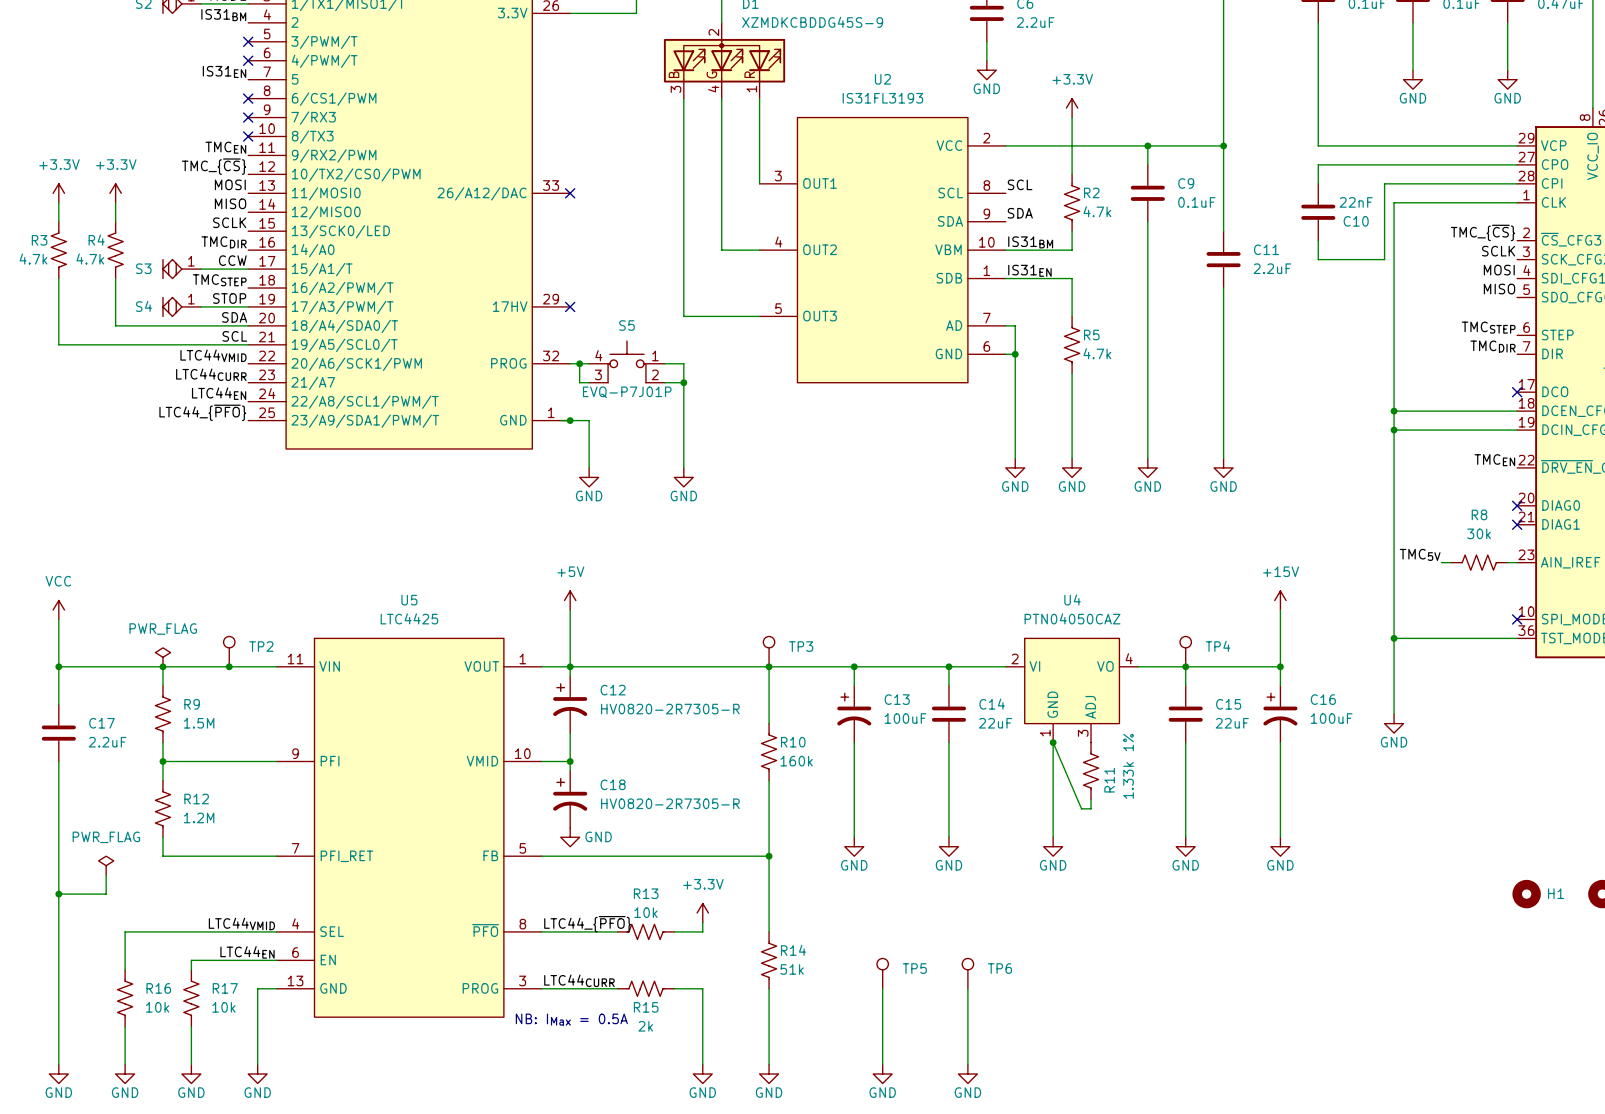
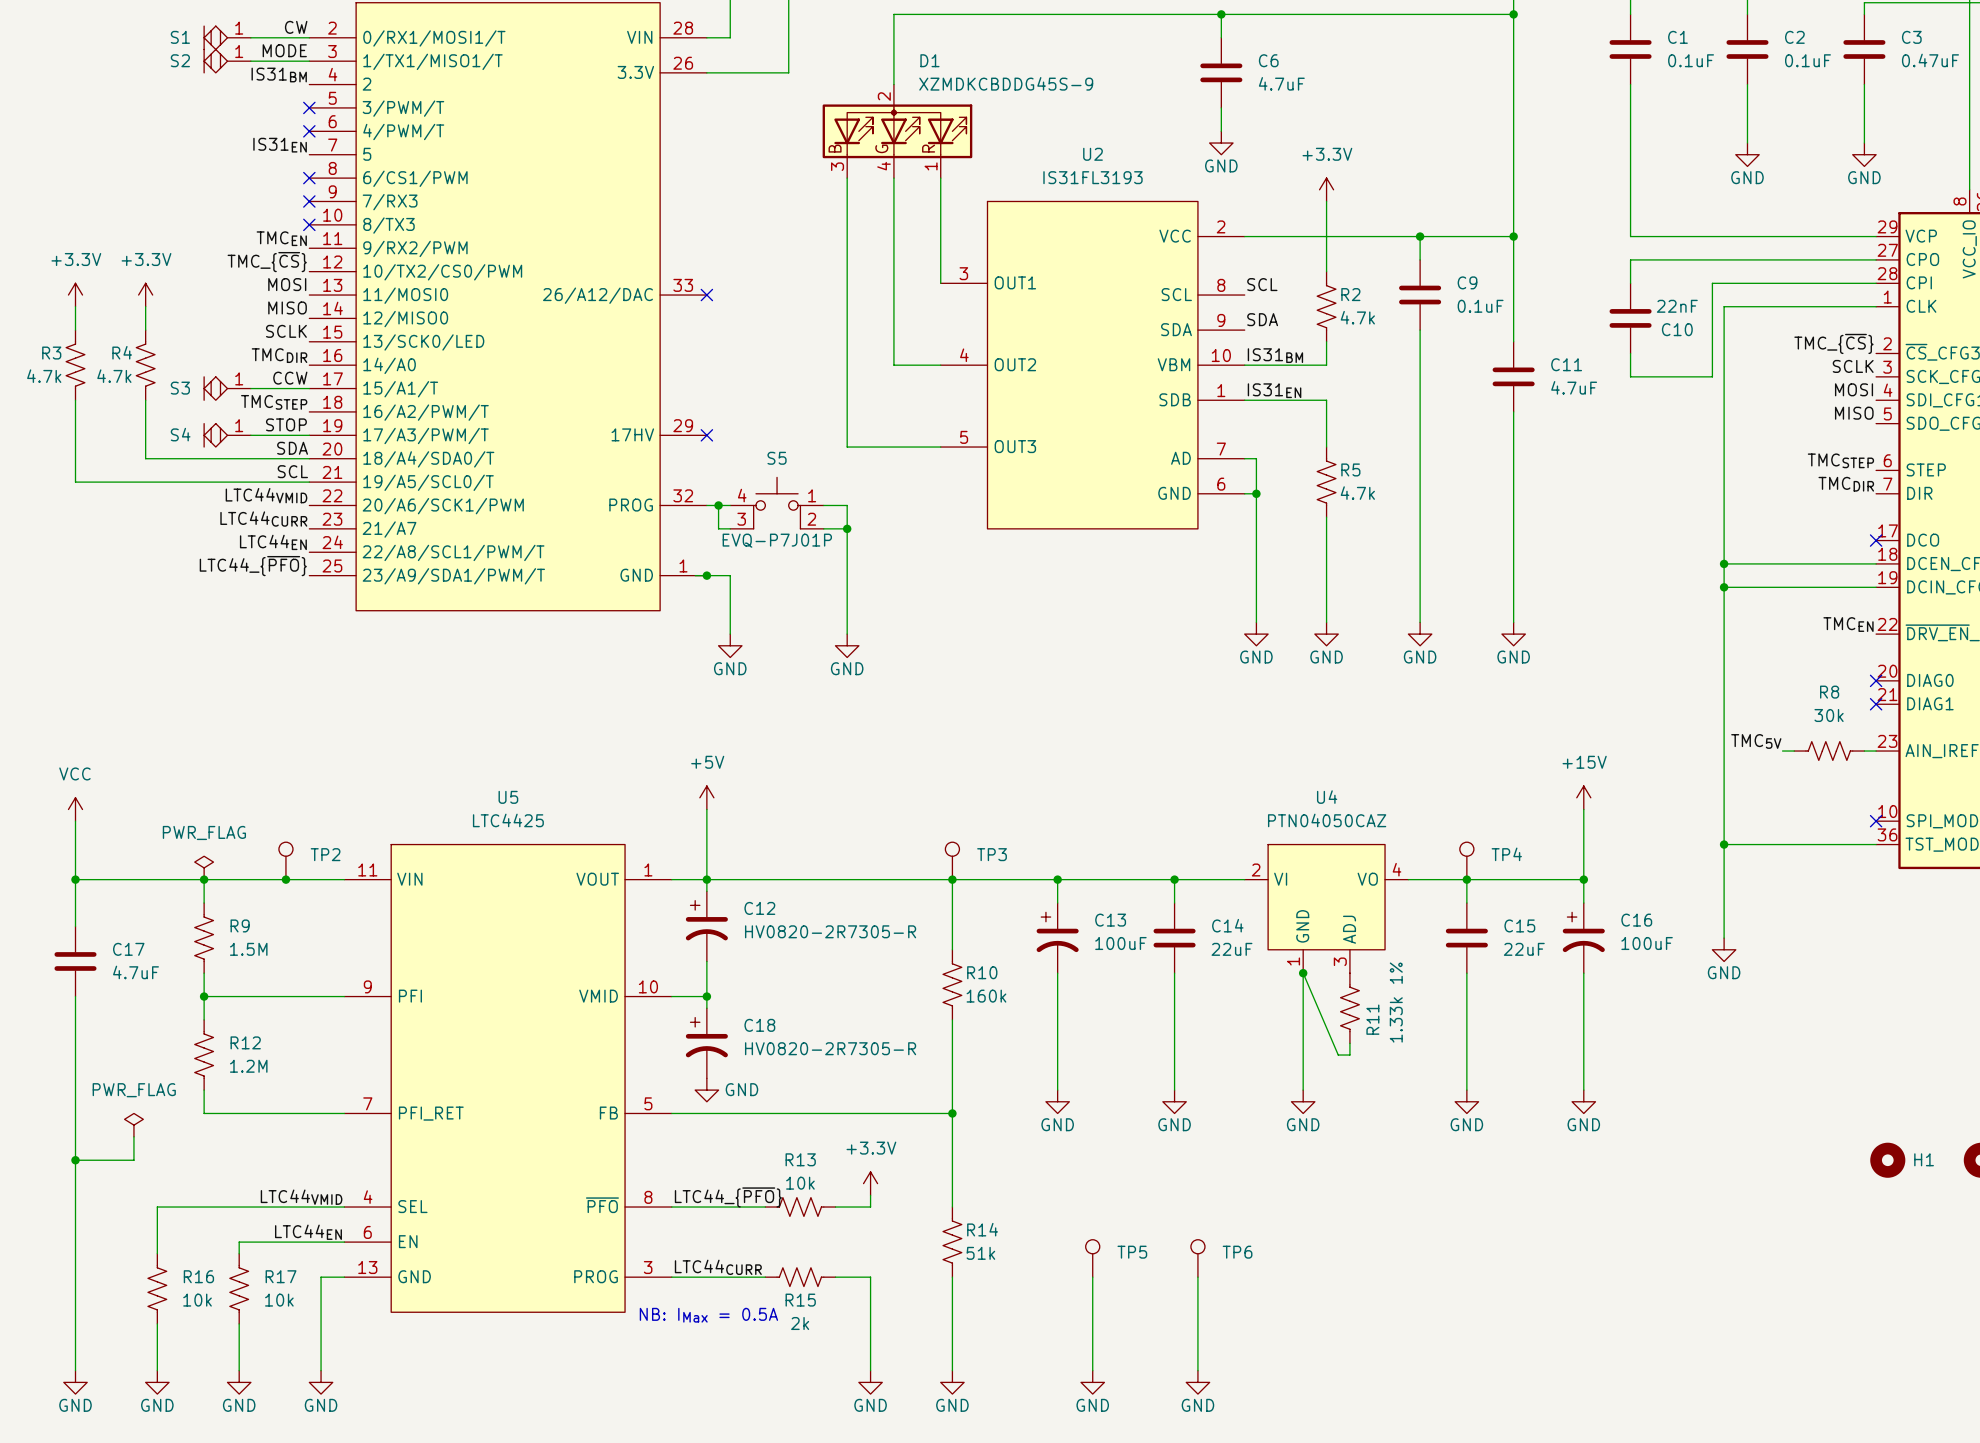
C6 value: 2.2uF (1035, 22) -> 4.7uF (1281, 83)
C11 value: 2.2uF (1272, 268) -> 4.7uF (1574, 387)
C17 value: 2.2uF (107, 742) -> 4.7uF (136, 972)

